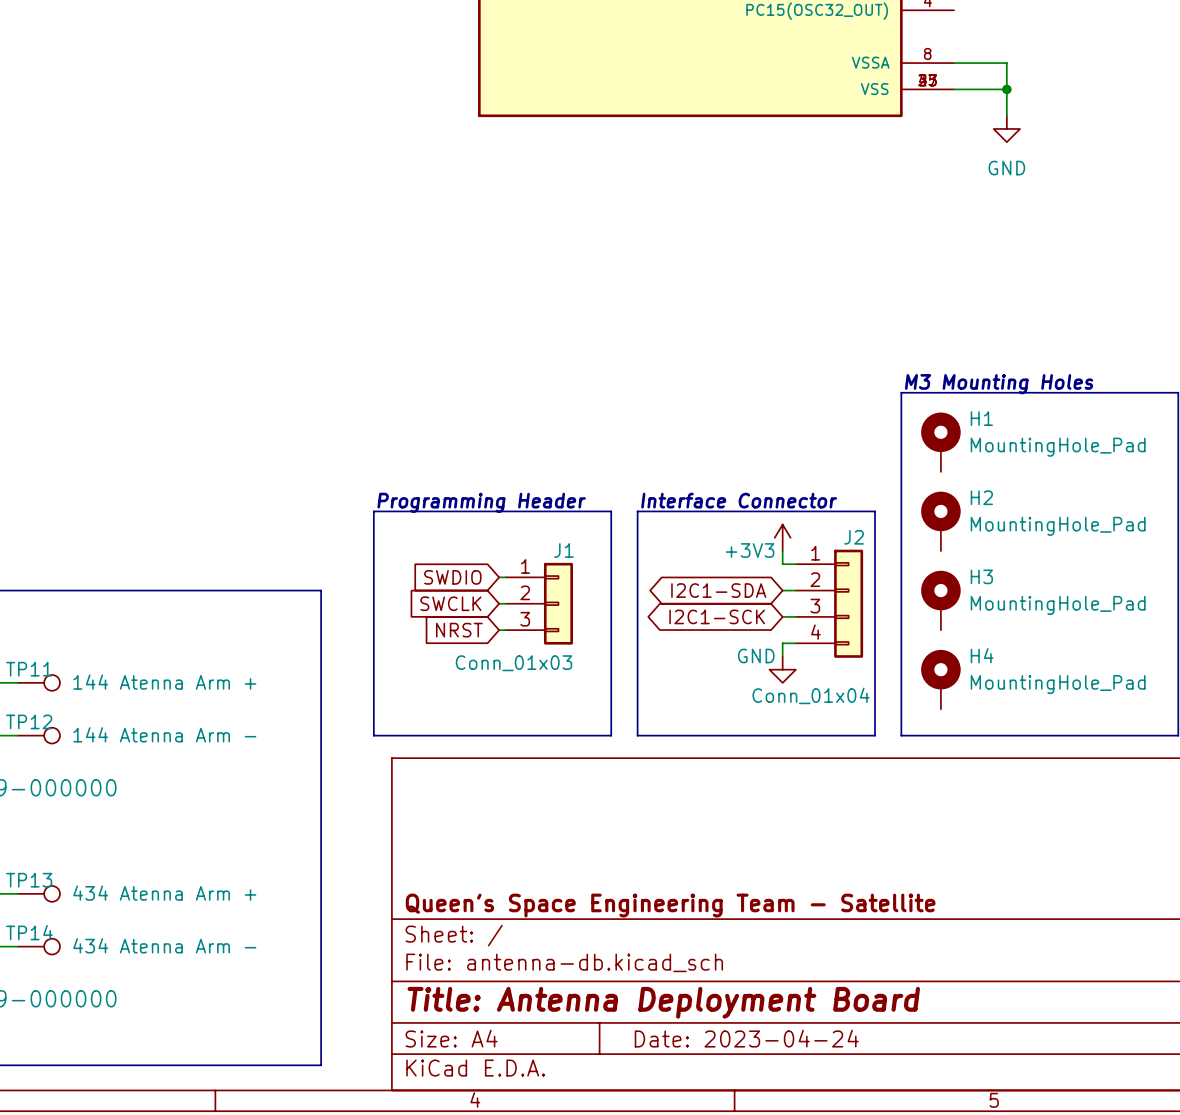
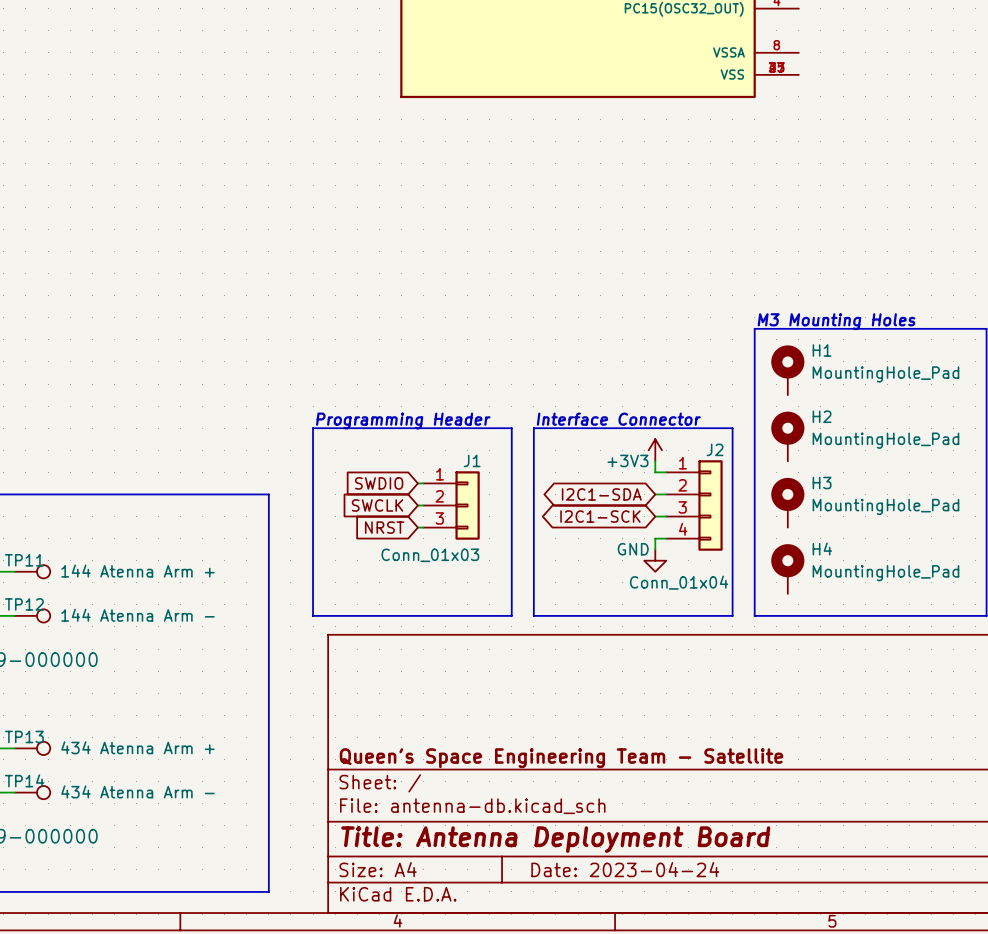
wire: (954, 63) (1006, 63) (1006, 115) -> none
wire: (954, 89) (1006, 89) -> none
junction: (1006, 89) -> none
power symbol: GND (1006, 128) -> none

